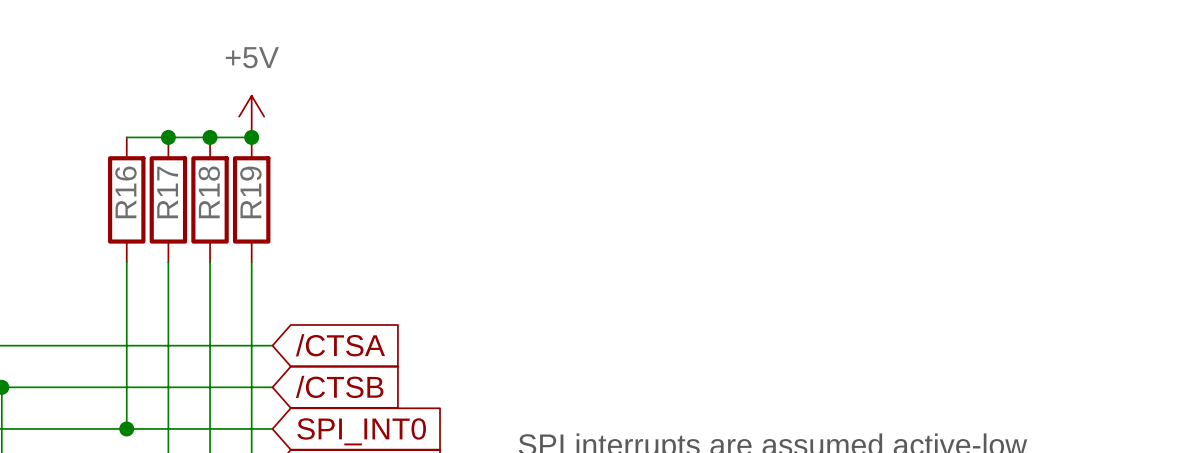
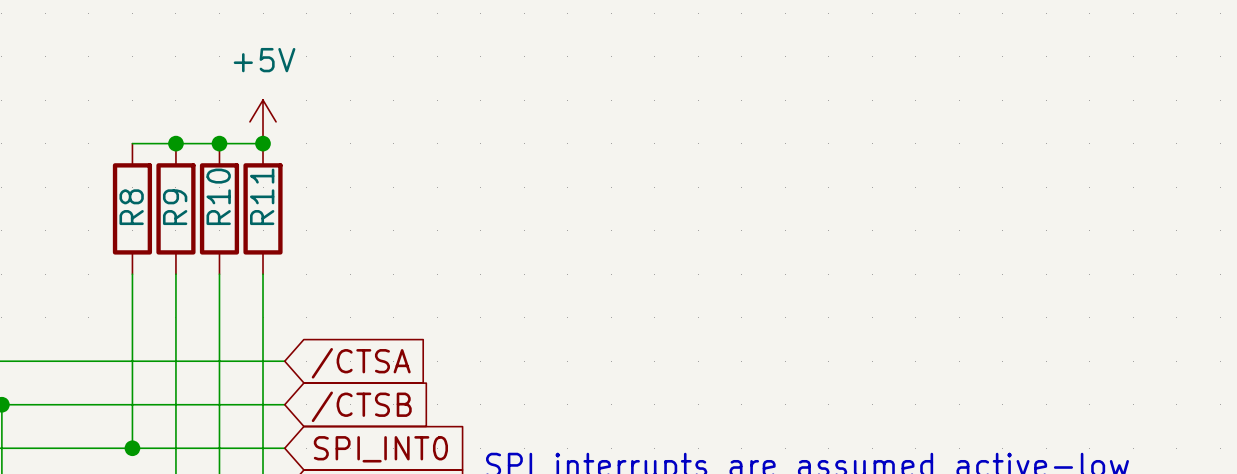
R16 name: R16 (125, 192) -> R8 (131, 207)
R17 name: R17 (167, 192) -> R9 (175, 207)
R18 name: R18 (209, 192) -> R10 (218, 196)
R19 name: R19 (250, 192) -> R11 (262, 196)

